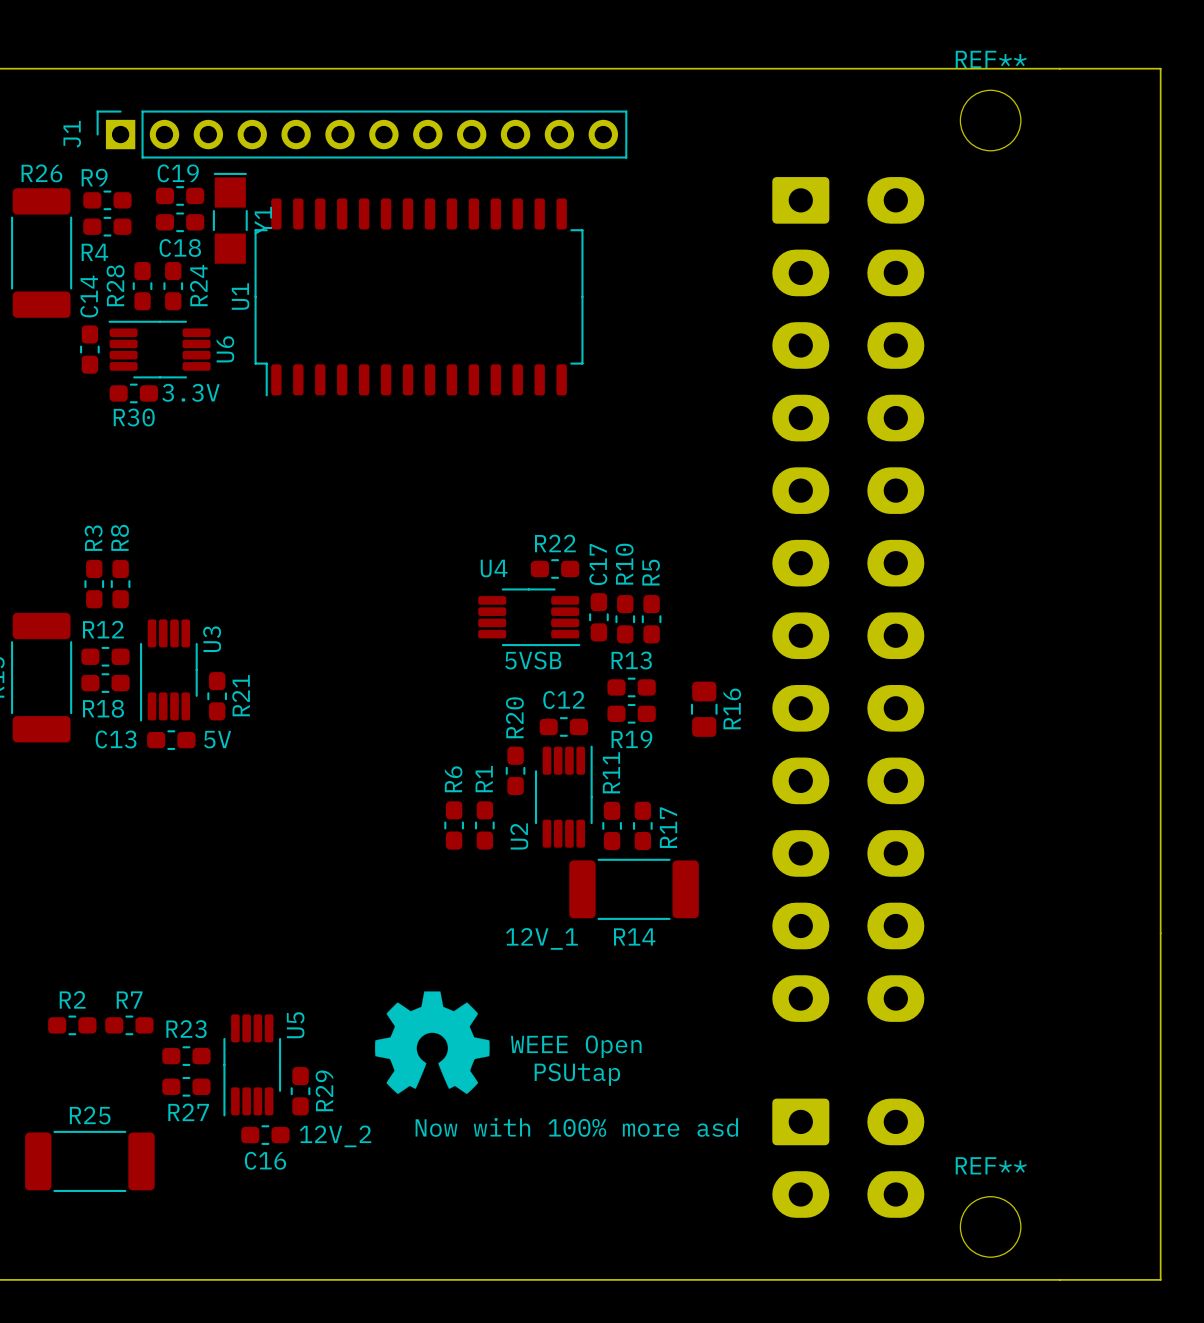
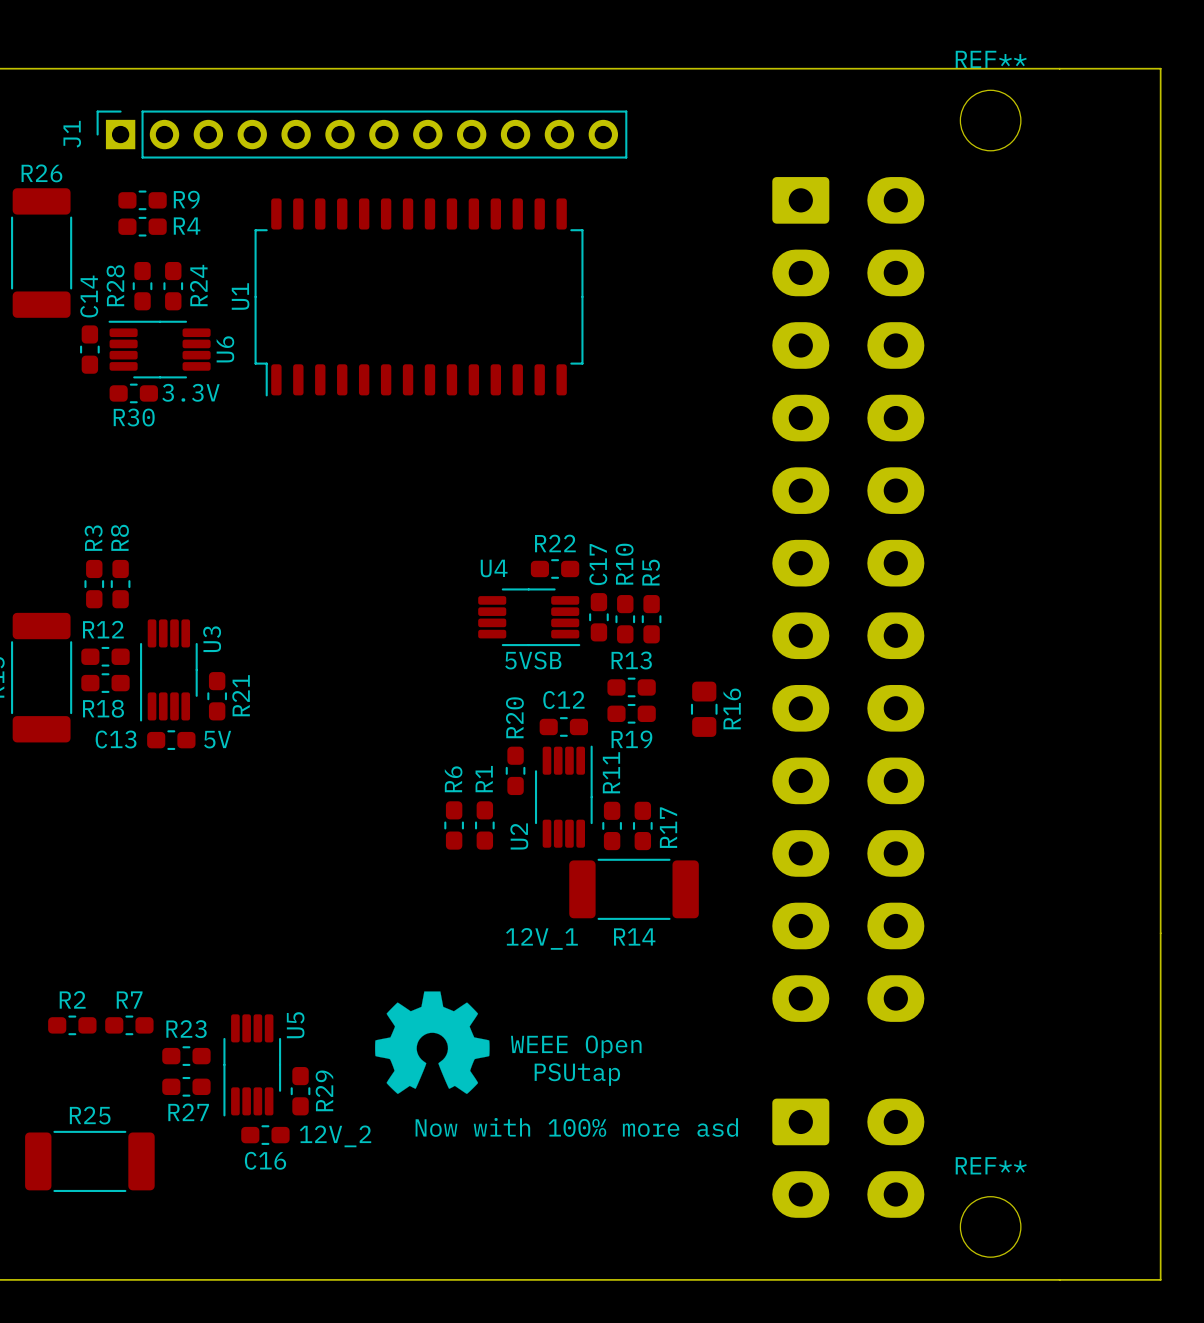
R9 name position: R9 (94, 177) -> R9 (186, 199)
C19: (180, 195) -> none
R9 position: (107, 200) -> (142, 200)
Y1: (230, 218) -> none
C18: (180, 222) -> none
R4 position: (107, 226) -> (142, 226)
R4 name position: R4 (94, 252) -> R4 (187, 226)

